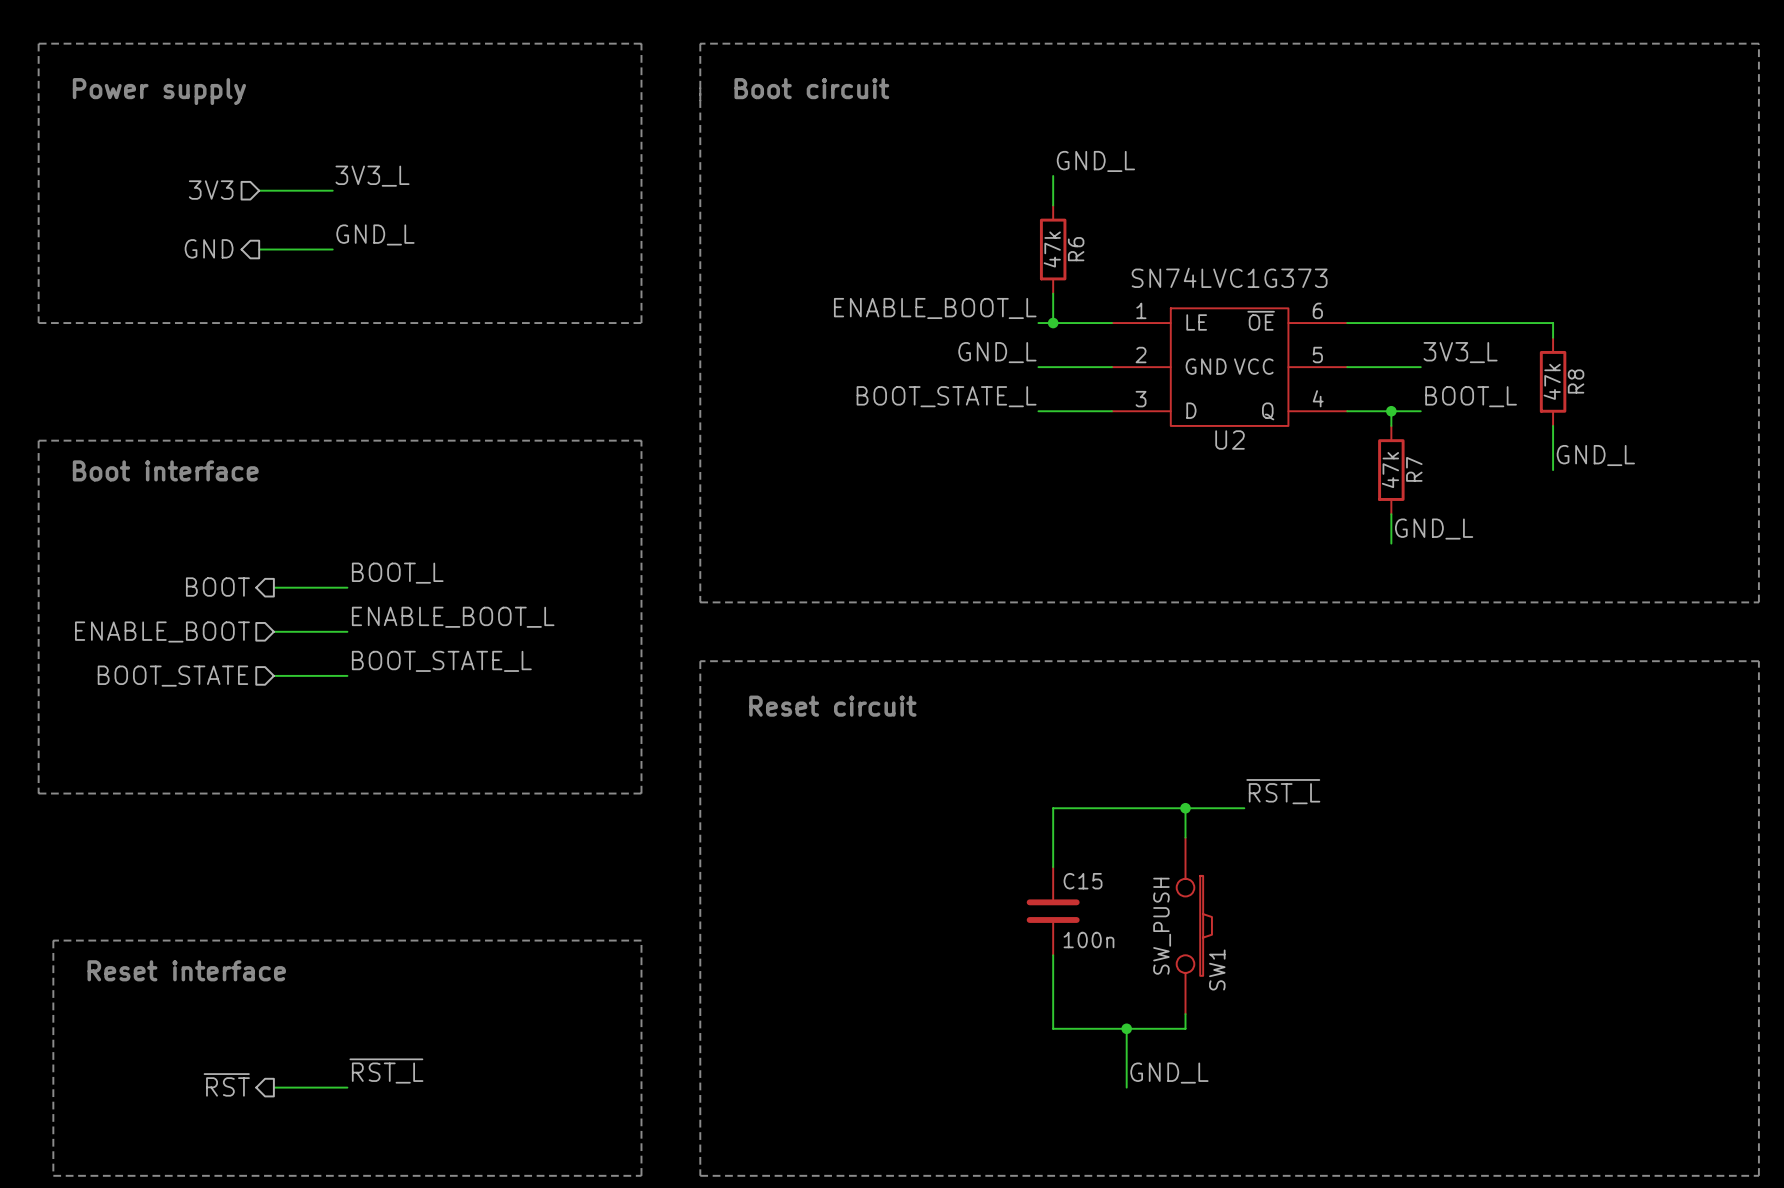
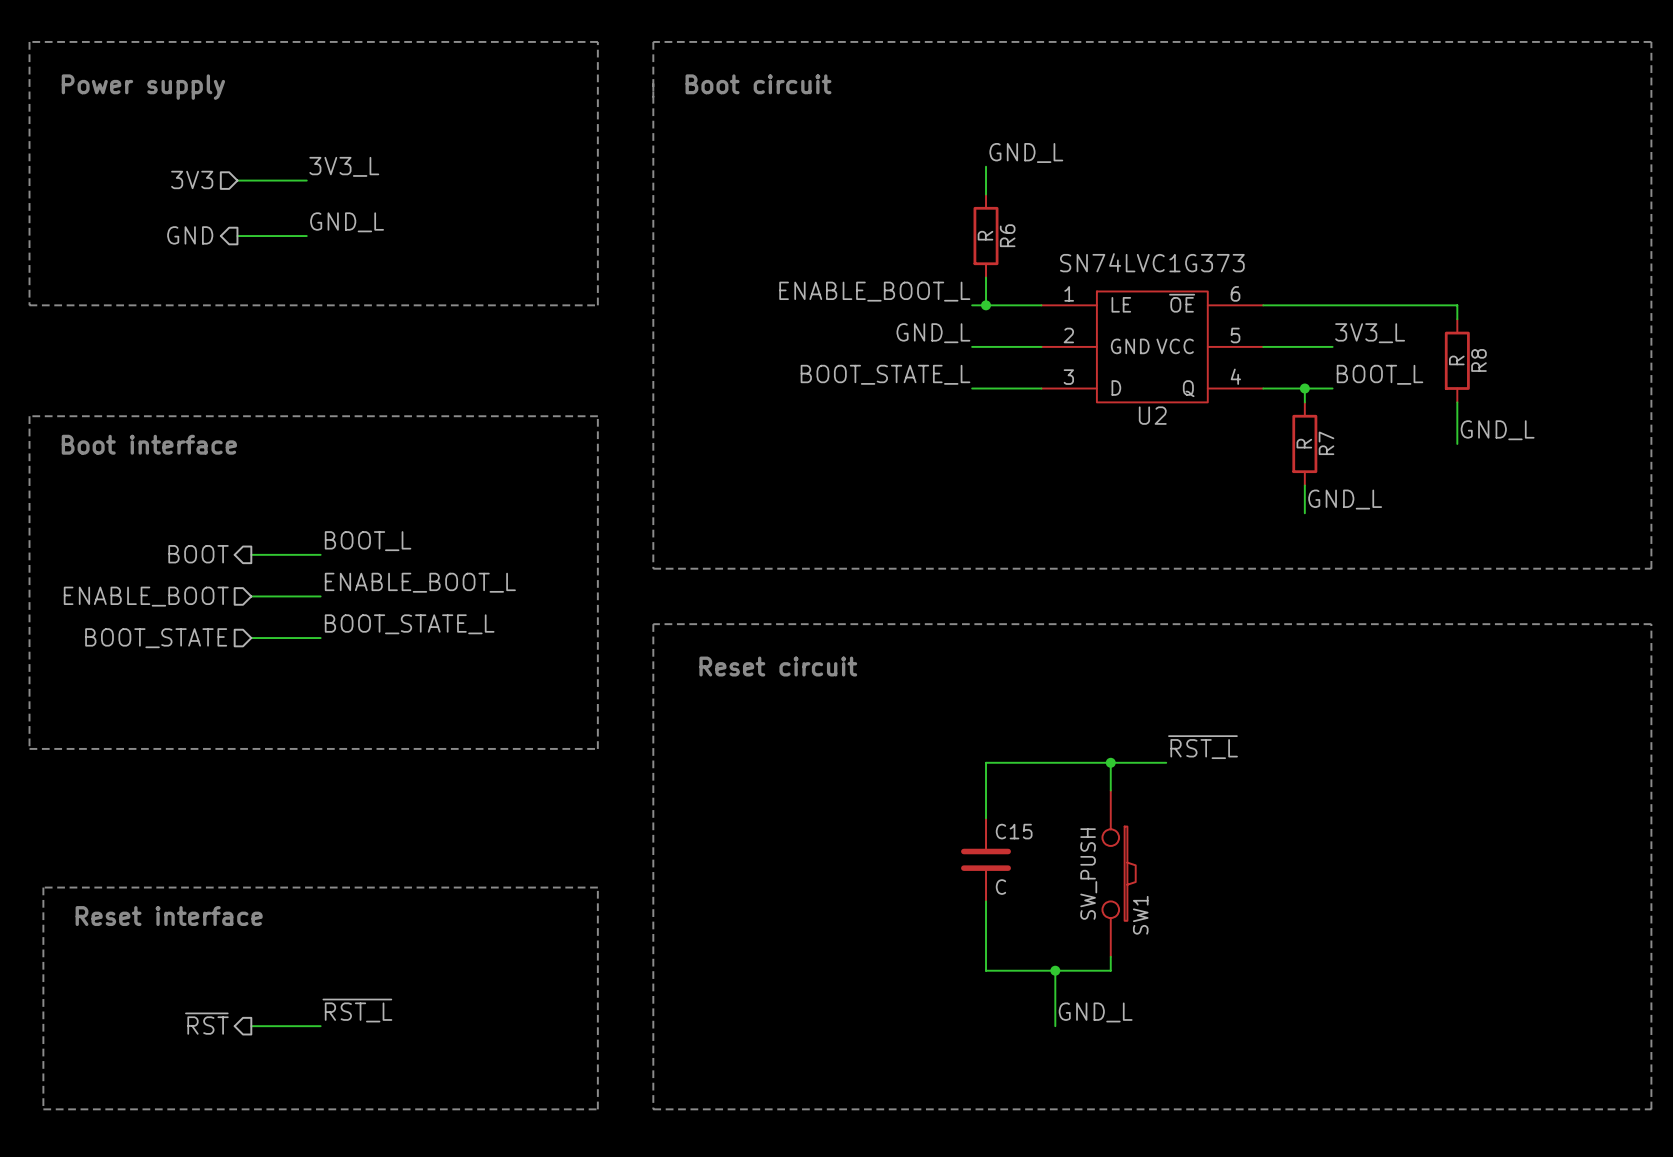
R6 value: 47k (1052, 249) -> R (985, 235)
R8 value: 47k (1552, 381) -> R (1456, 360)
R7 value: 47k (1390, 470) -> R (1304, 443)
C15 value: 100n (1088, 940) -> C (1000, 887)

